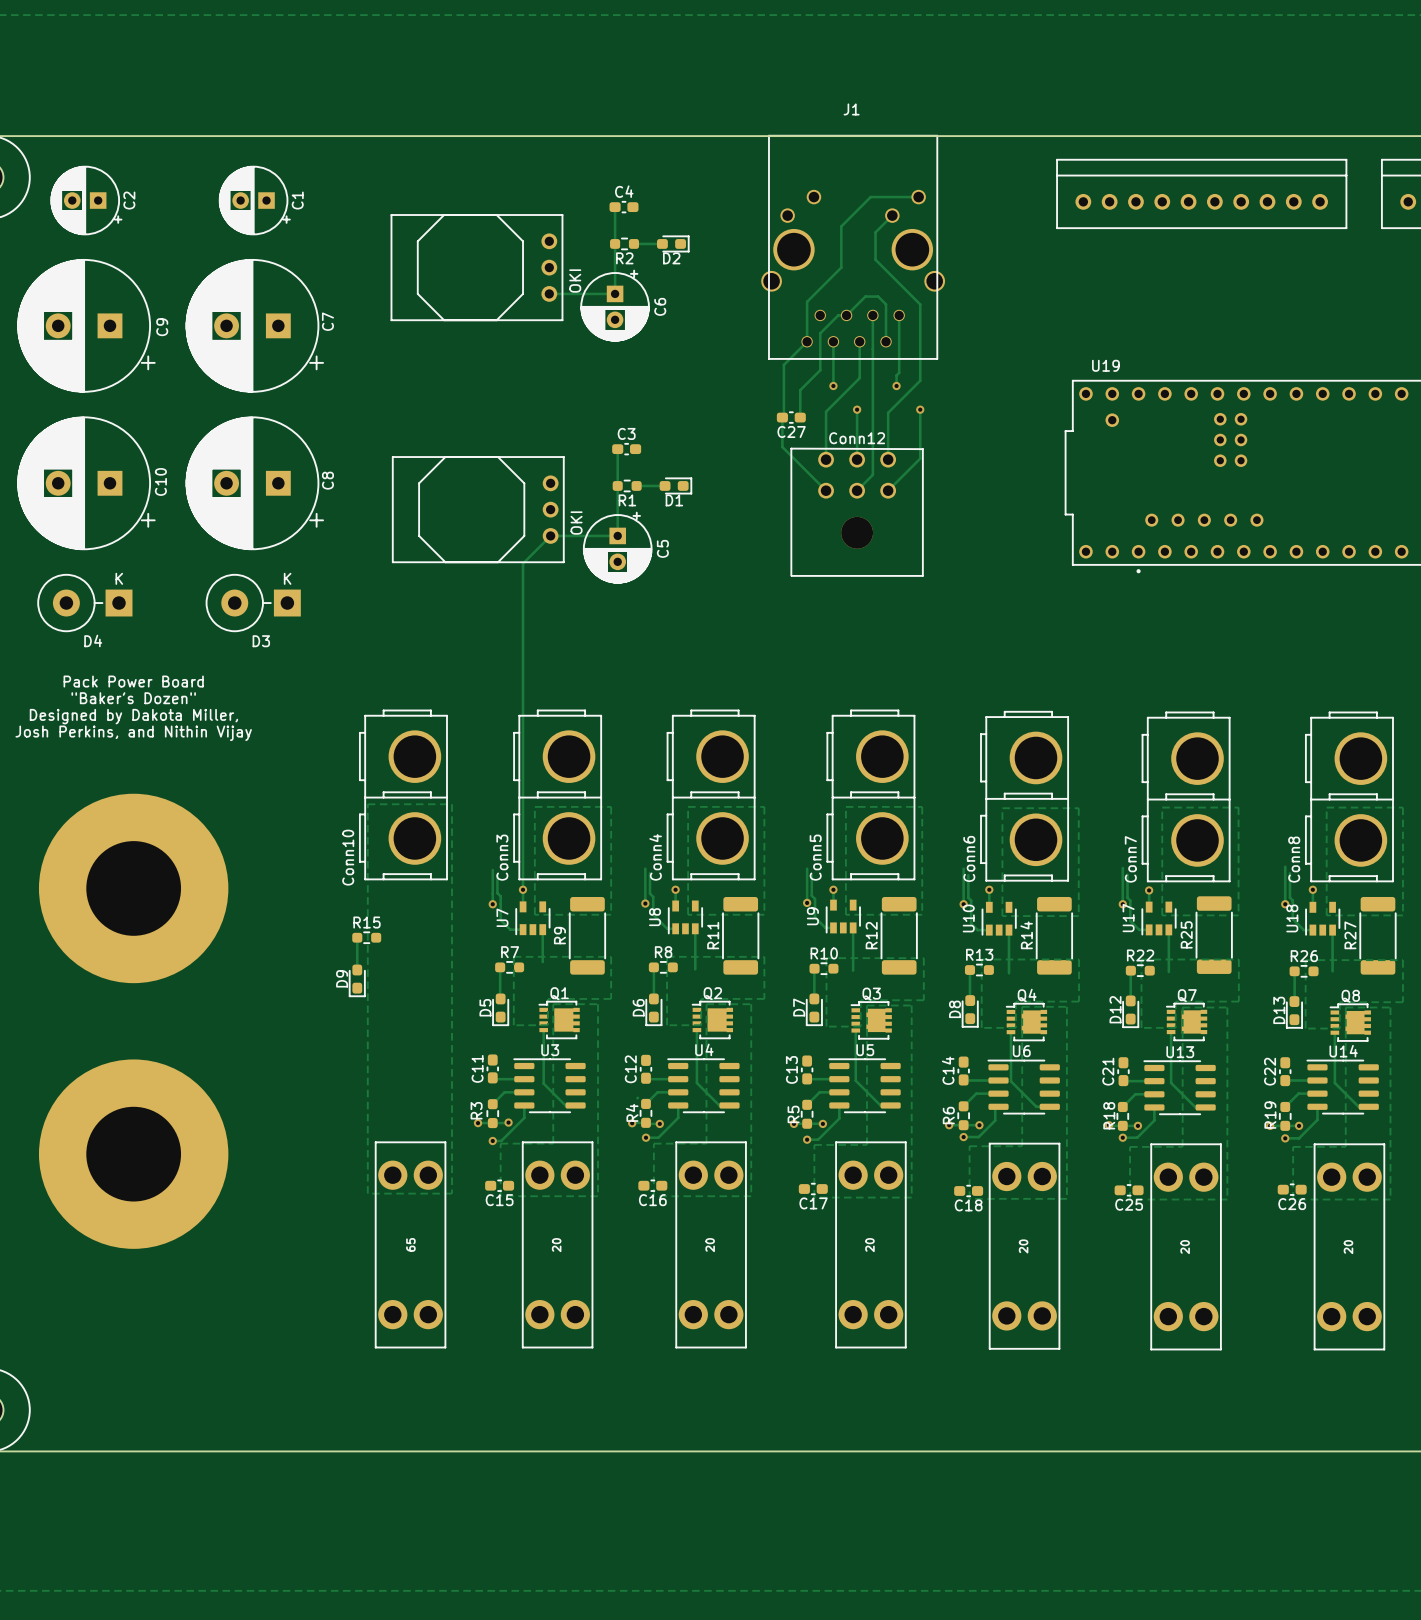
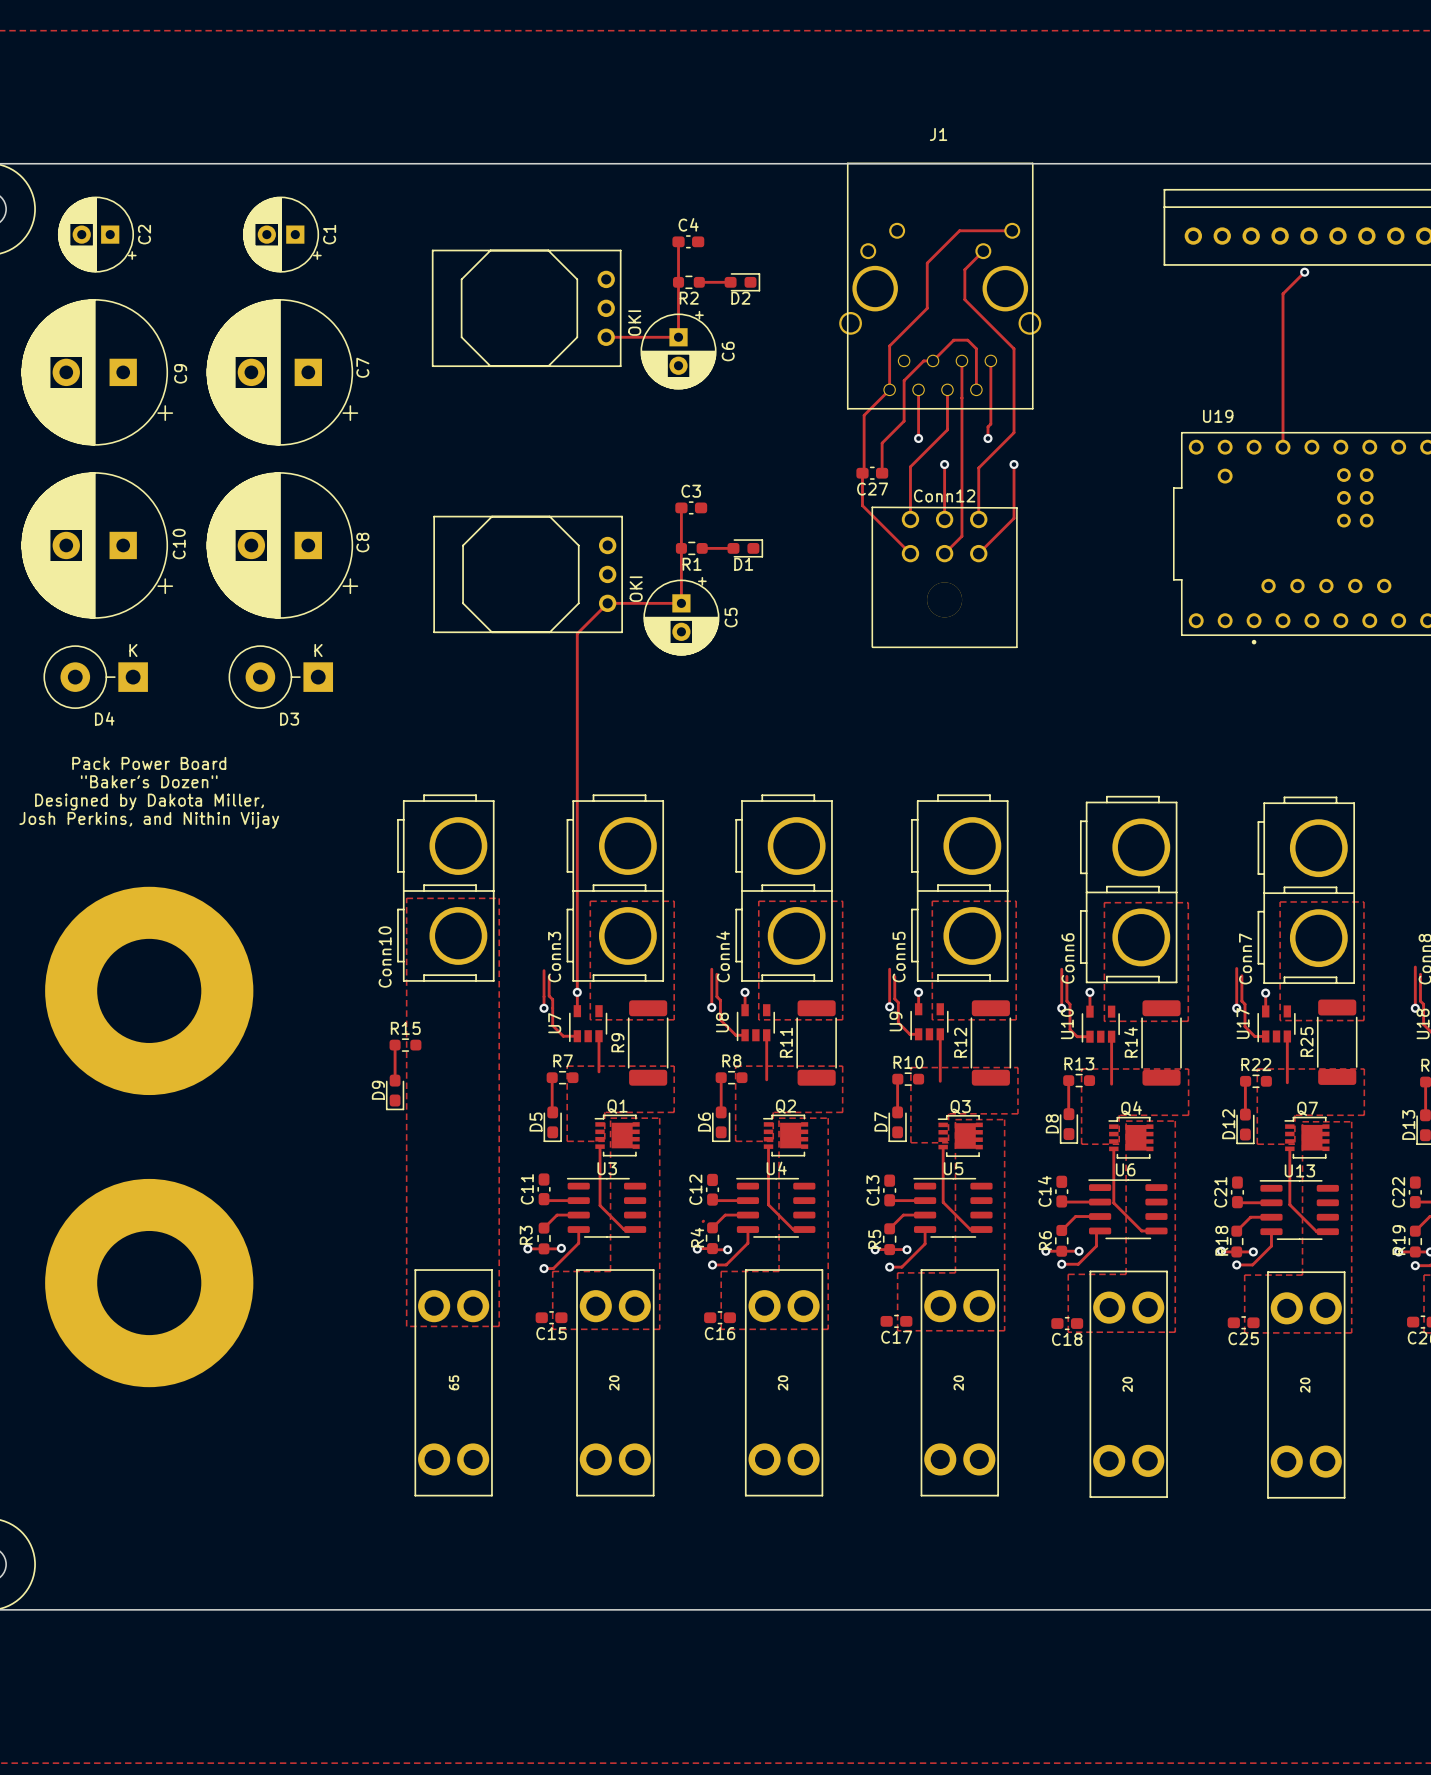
track: none -> (1304, 272) (1283, 293) (1283, 447)
via: none -> (1304, 272)

